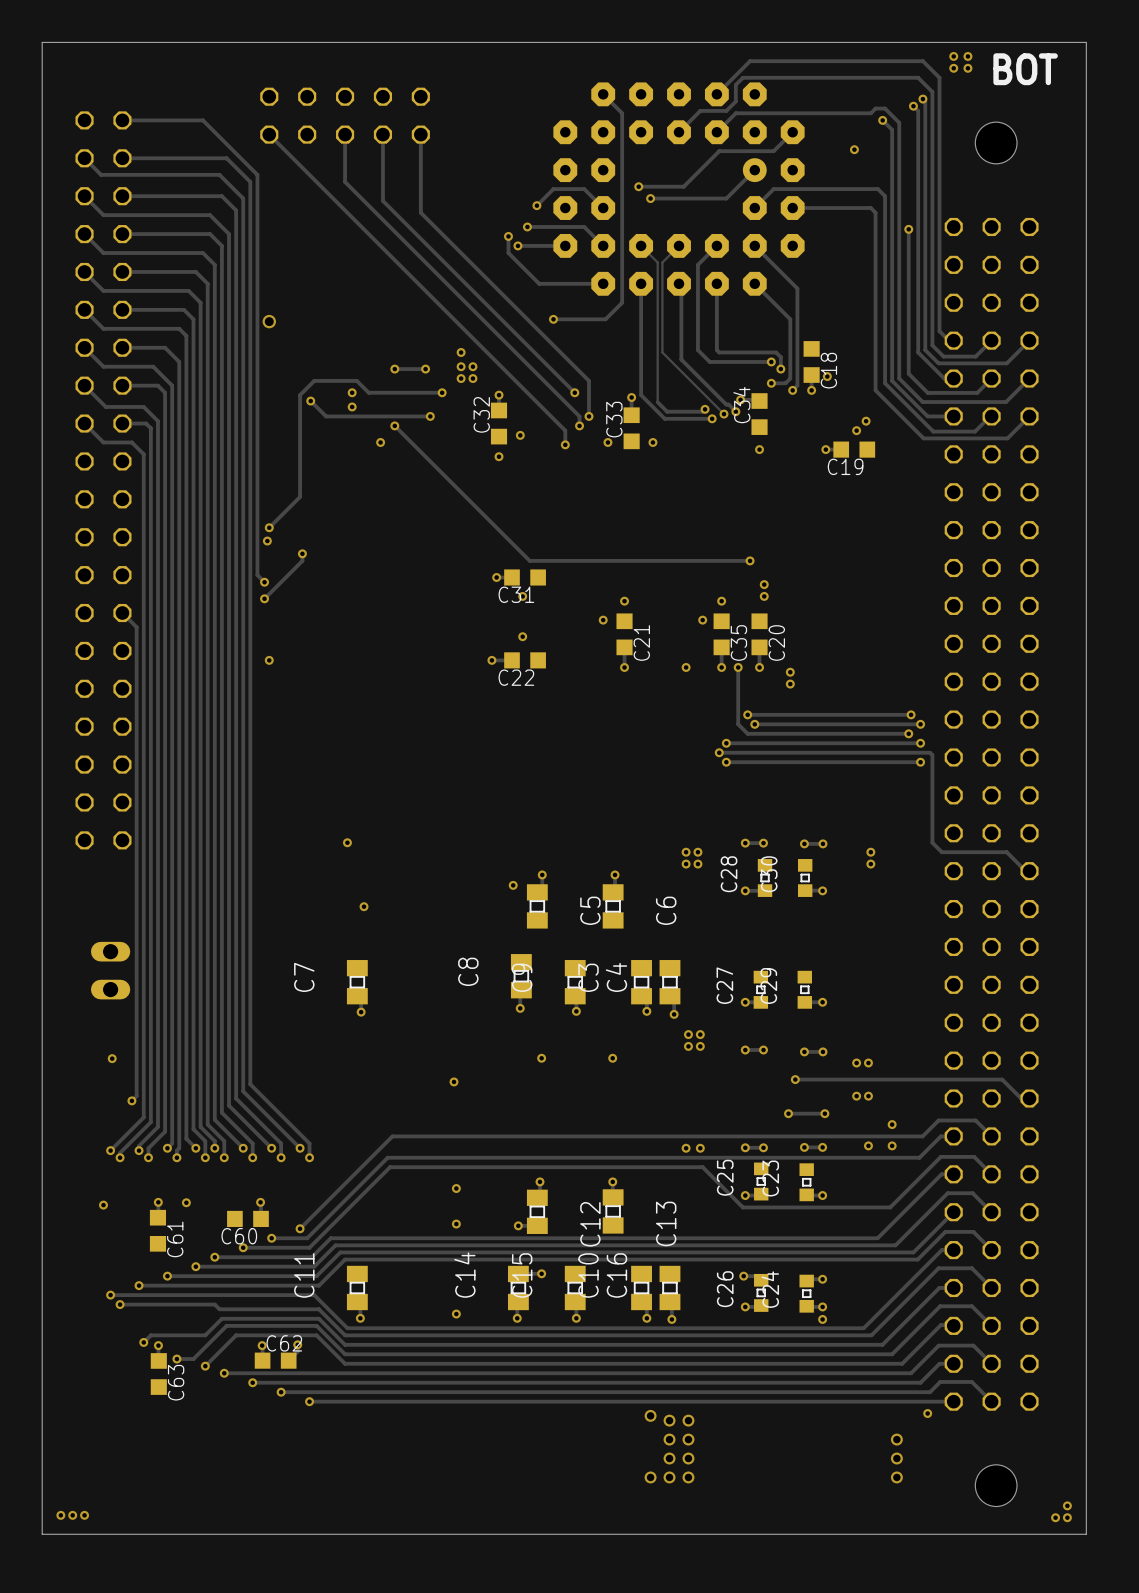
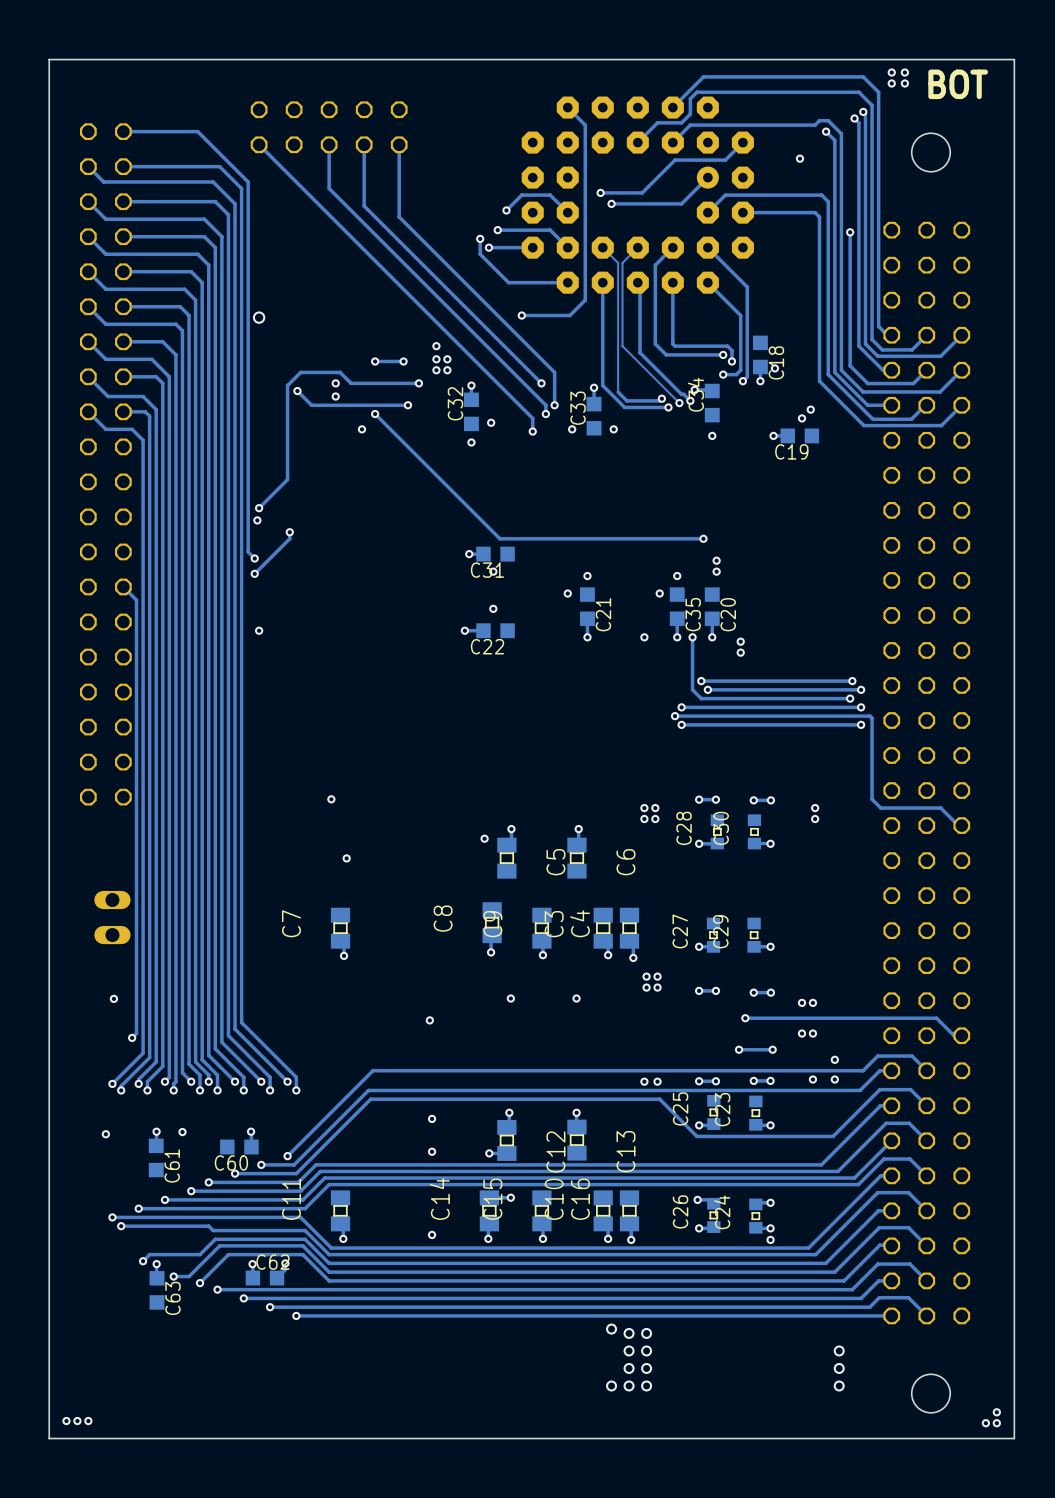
via: (927, 1413) -> none

